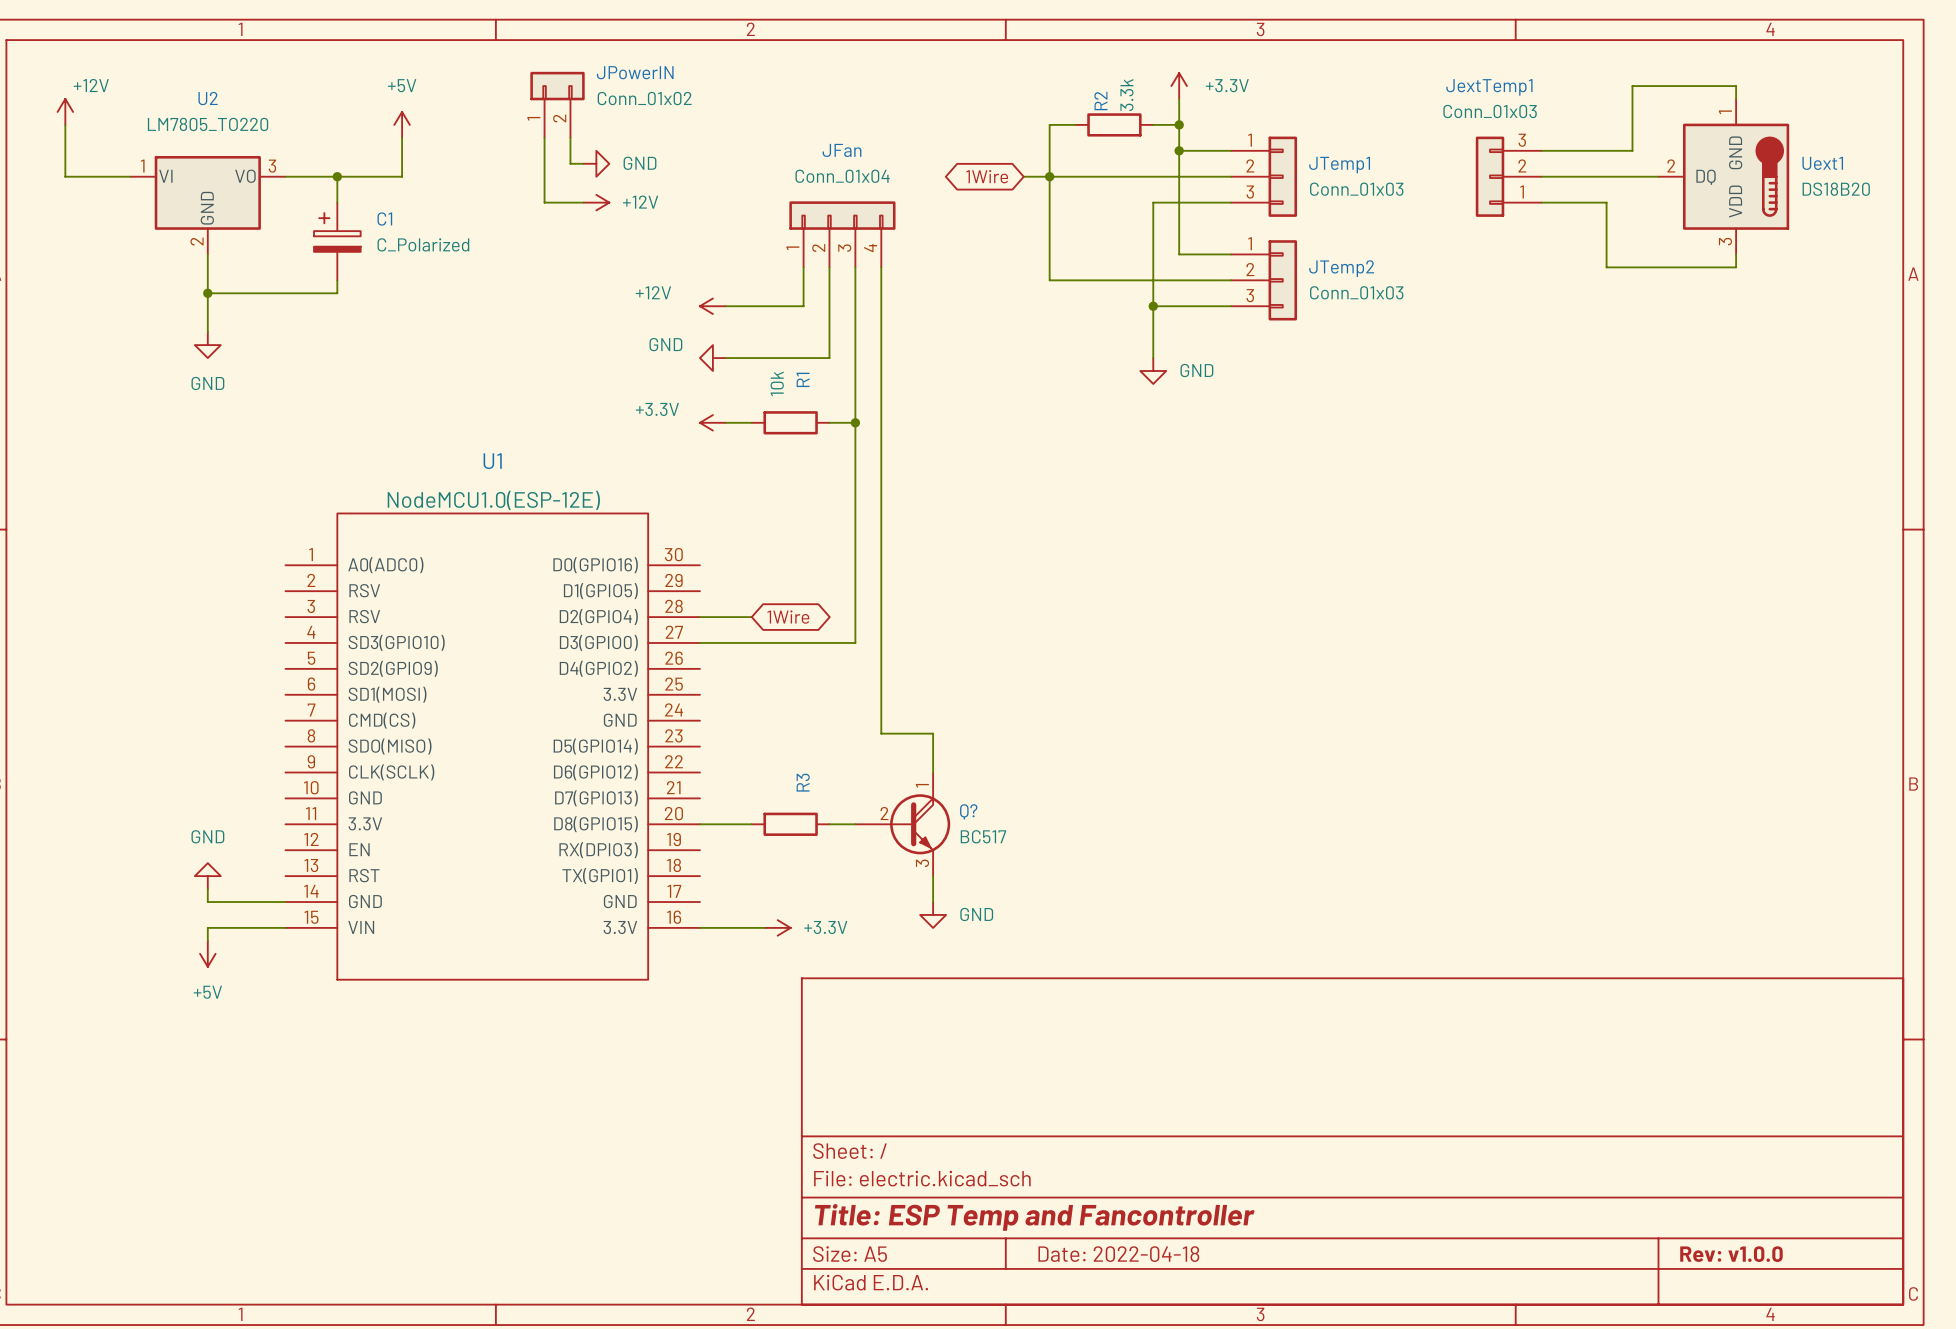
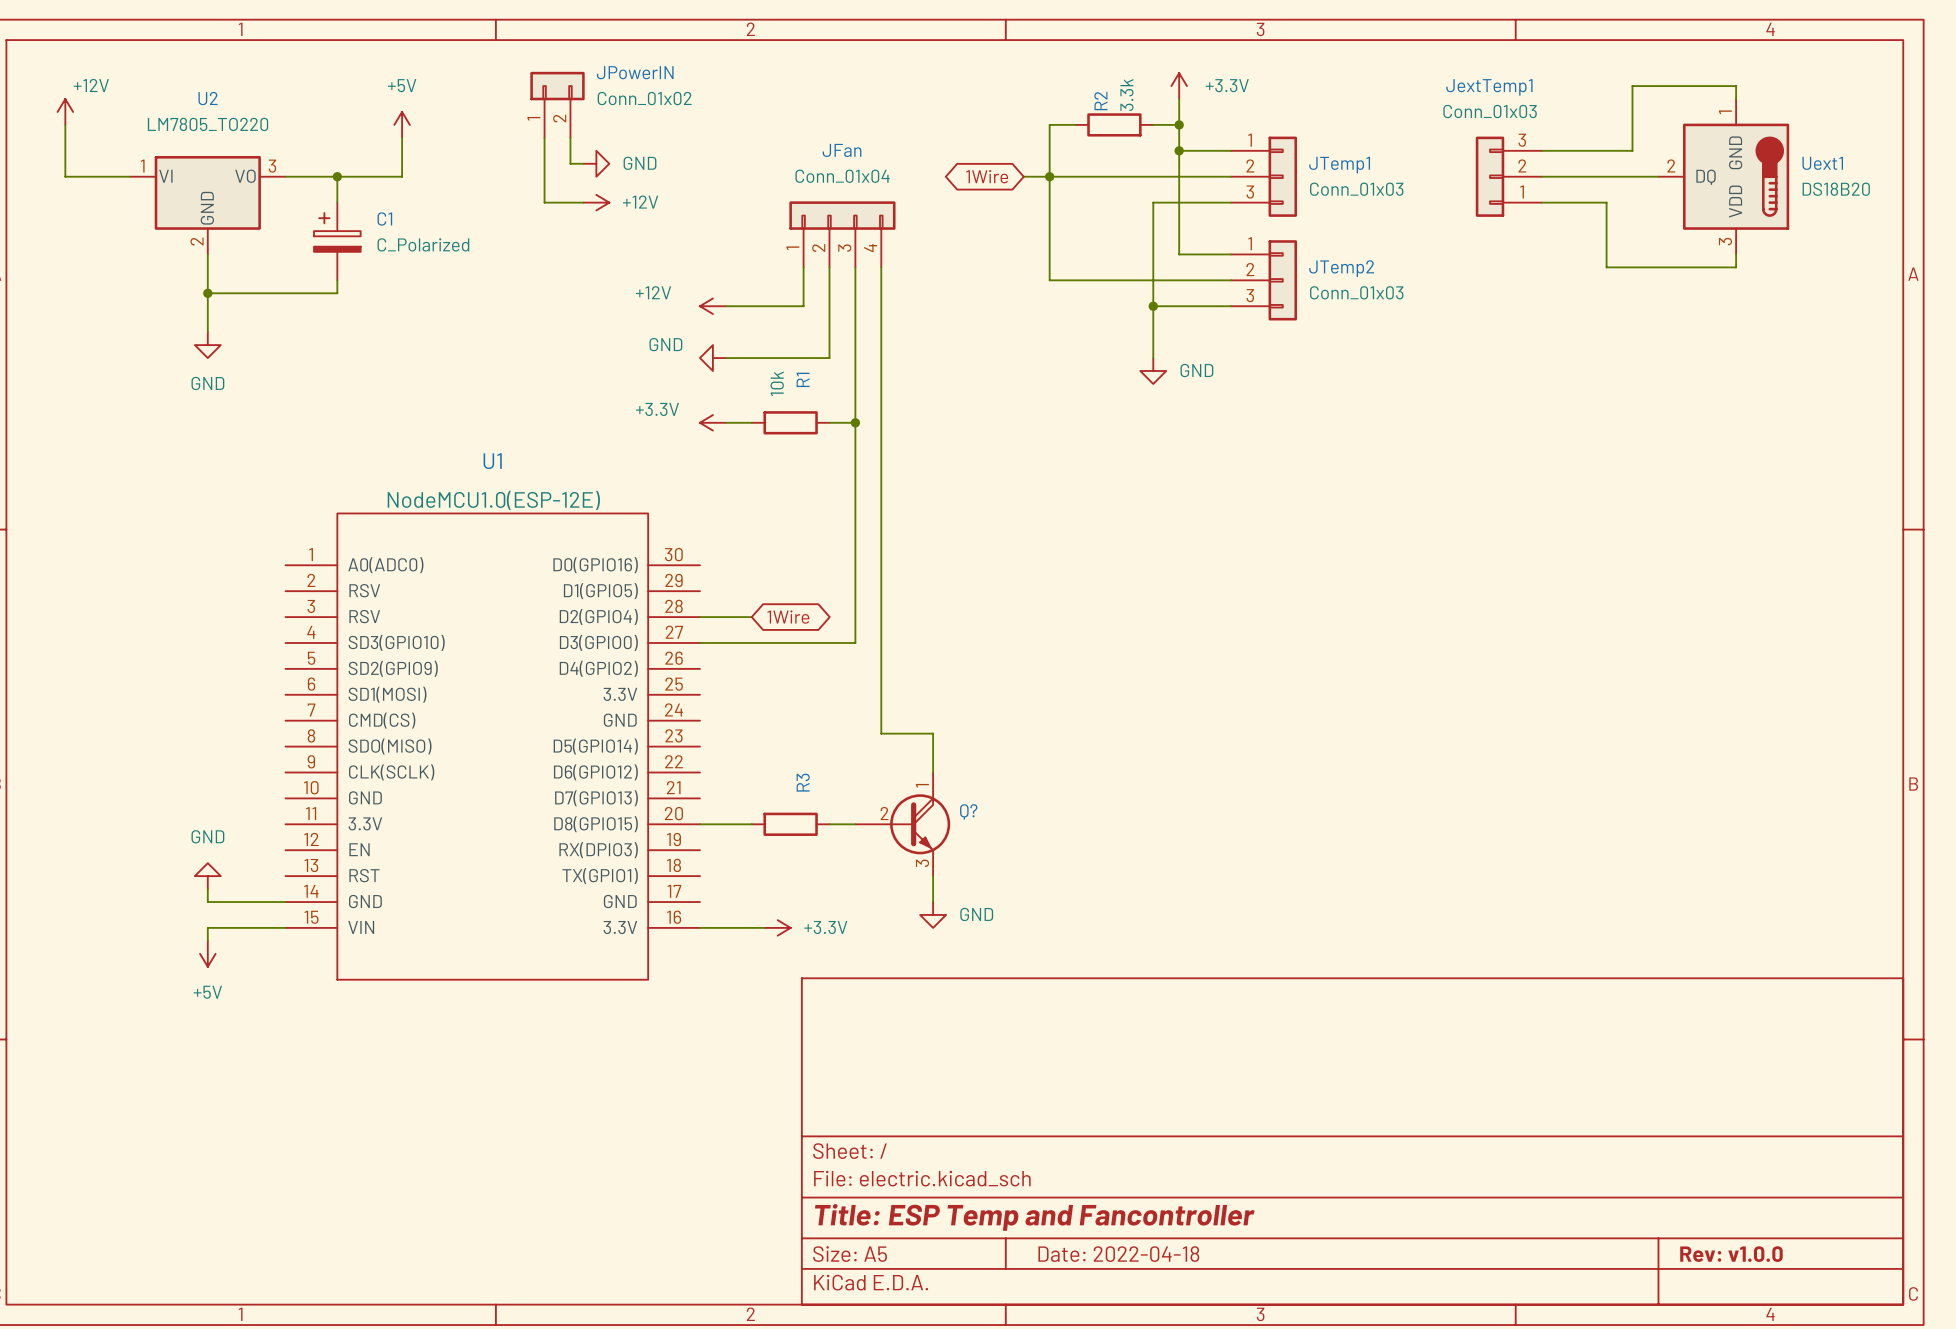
Q? value: BC517 (983, 836) -> none

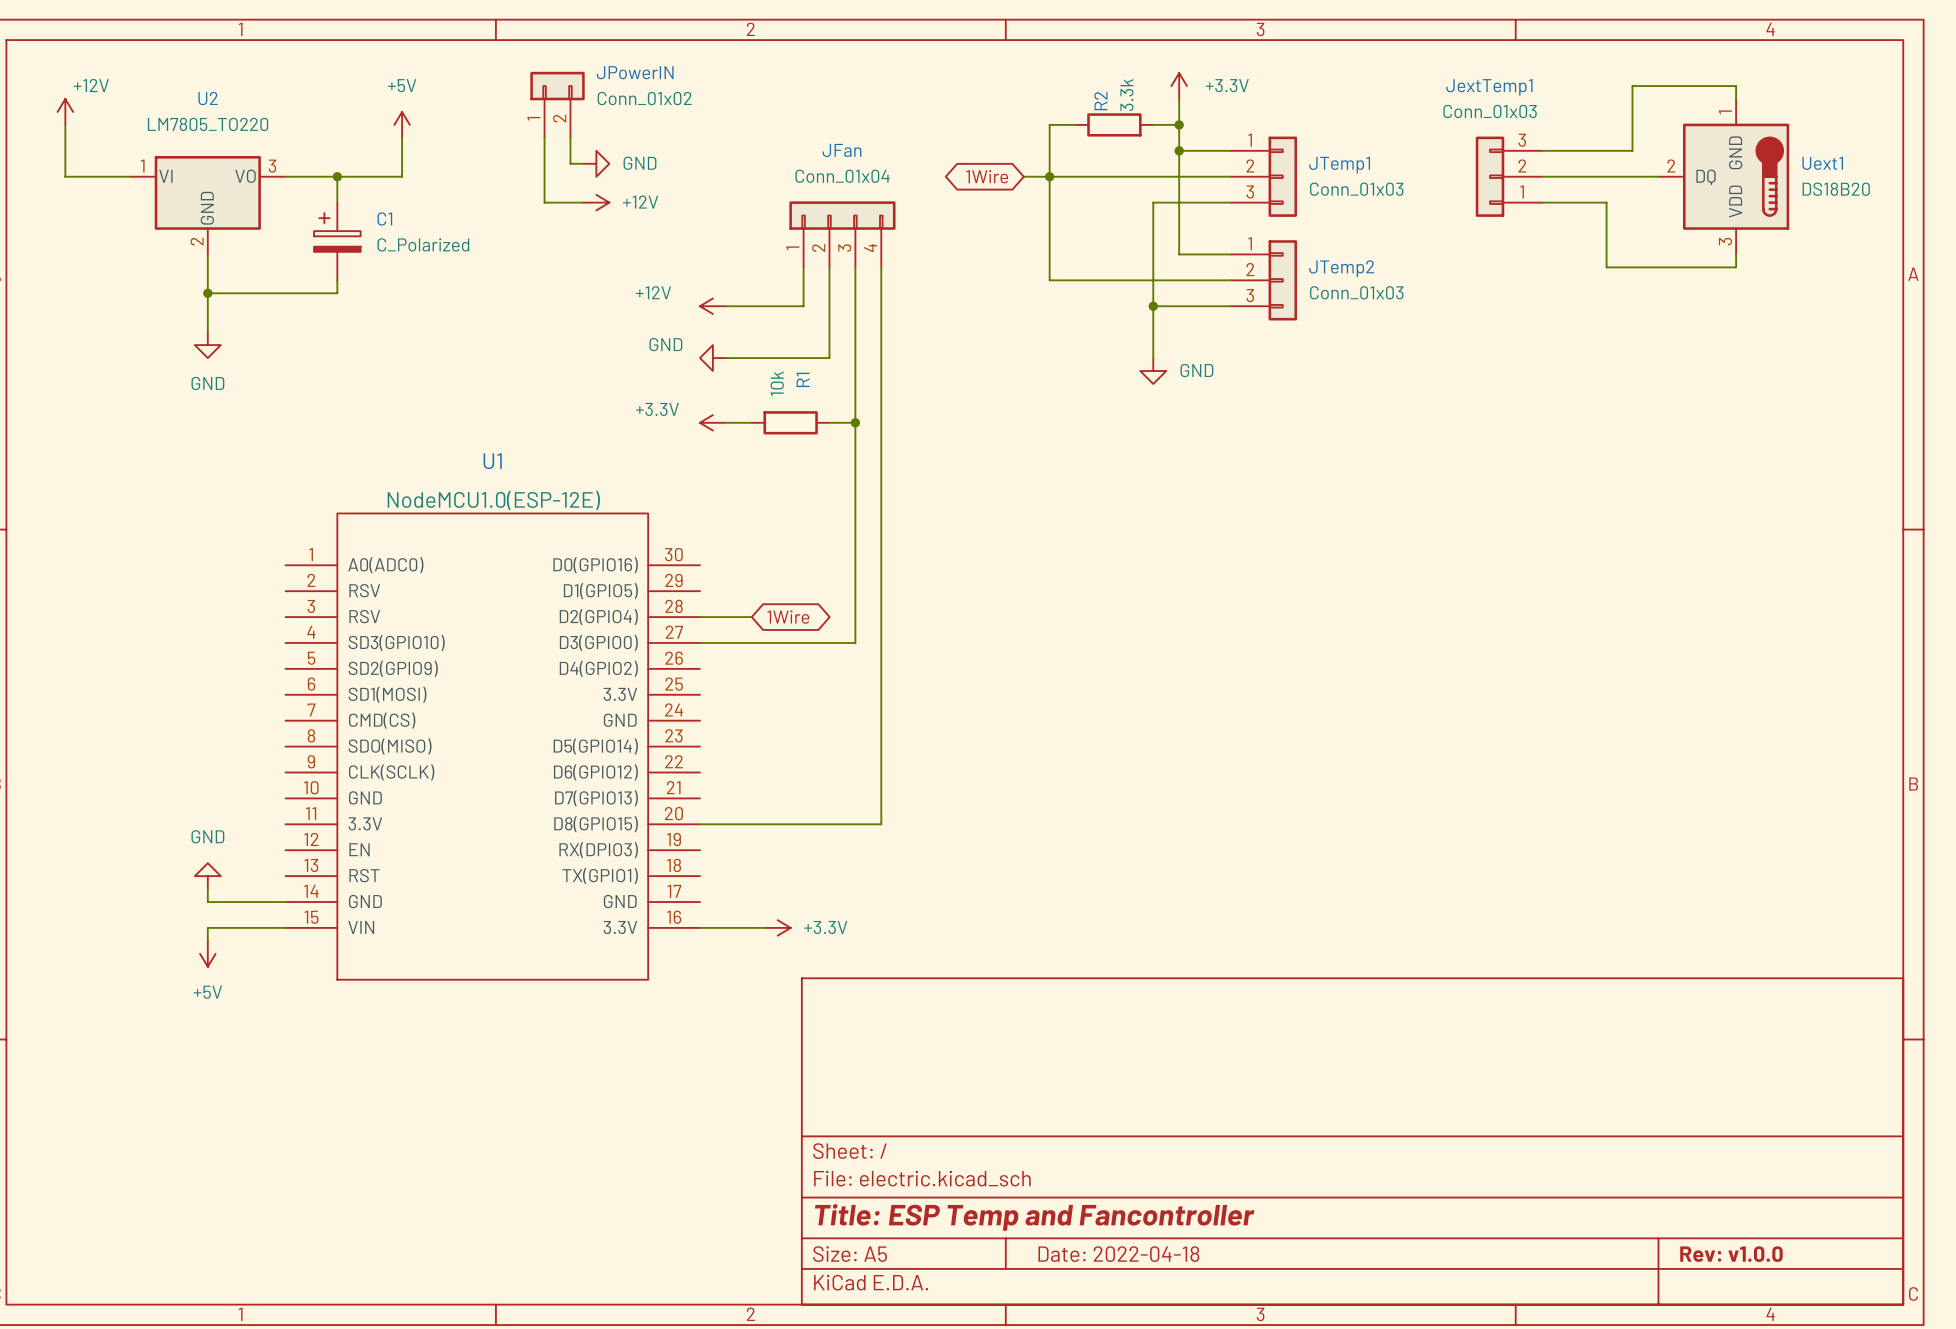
wire: (881, 733) (933, 733) (933, 772) -> (881, 733) (881, 824) (855, 824)
wire: none -> (751, 824) (829, 824)
R3: (790, 824) -> none
Q?: (902, 824) -> none
wire: (933, 876) (933, 902) -> none
power symbol: GND (933, 914) -> none

